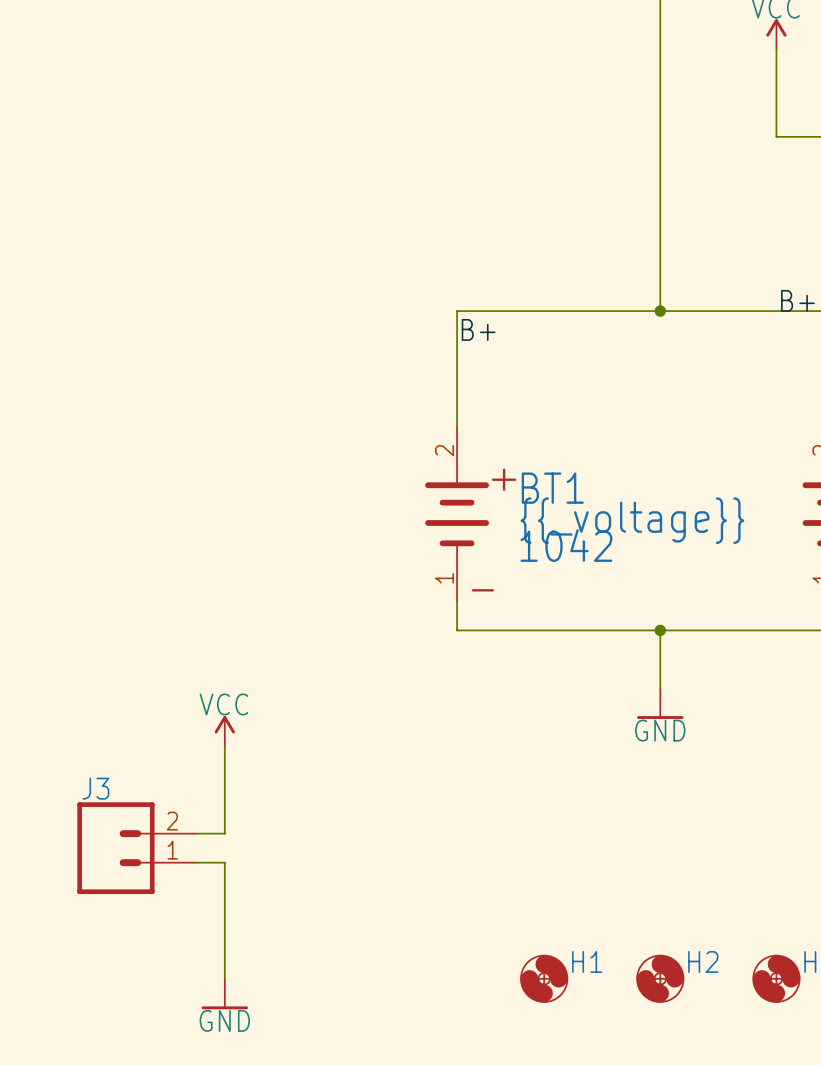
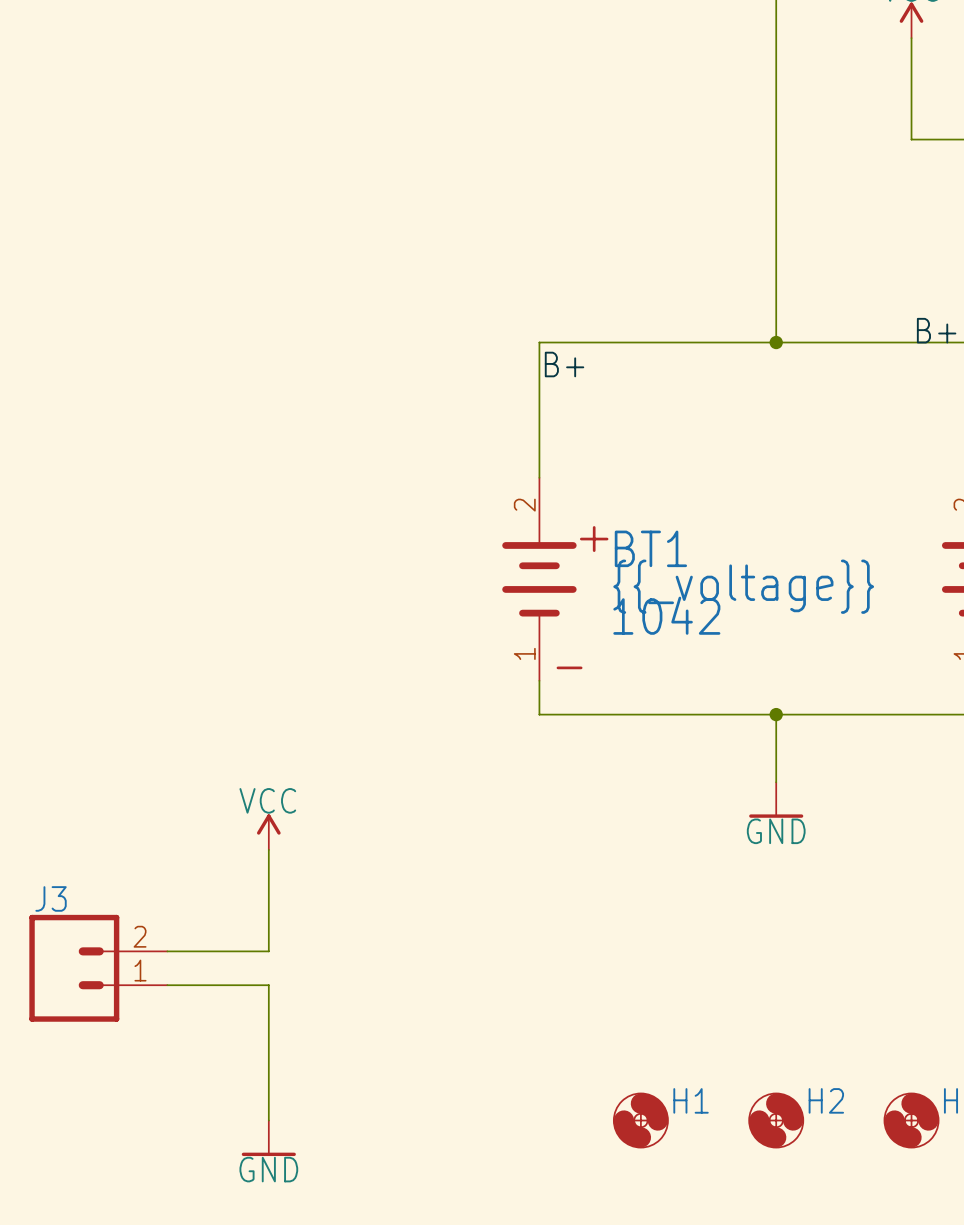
J3 position: (136, 848) -> (98, 968)

